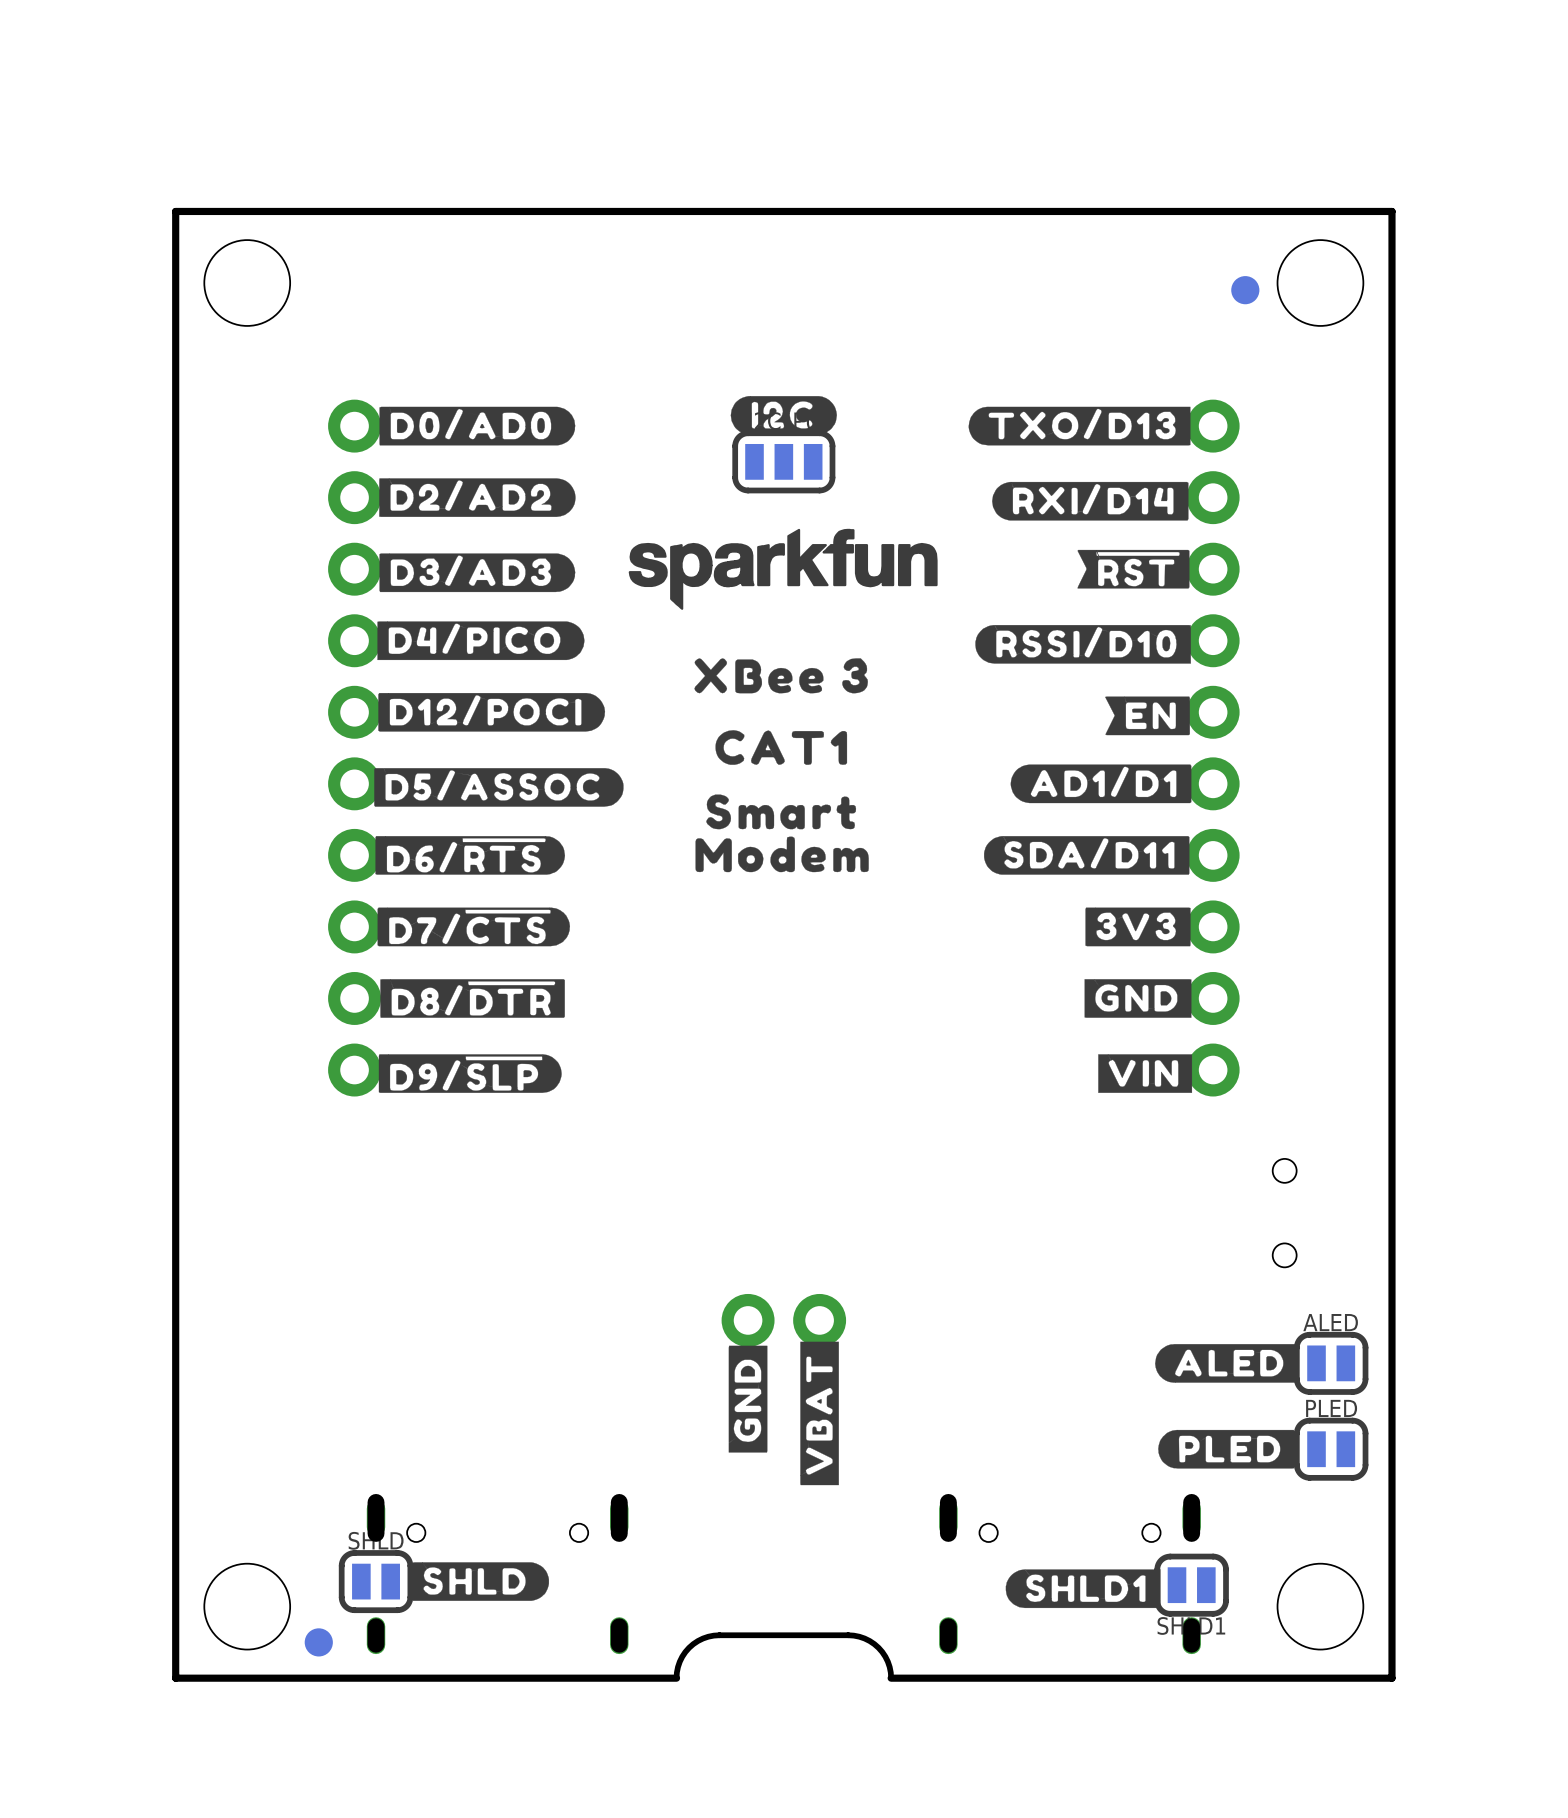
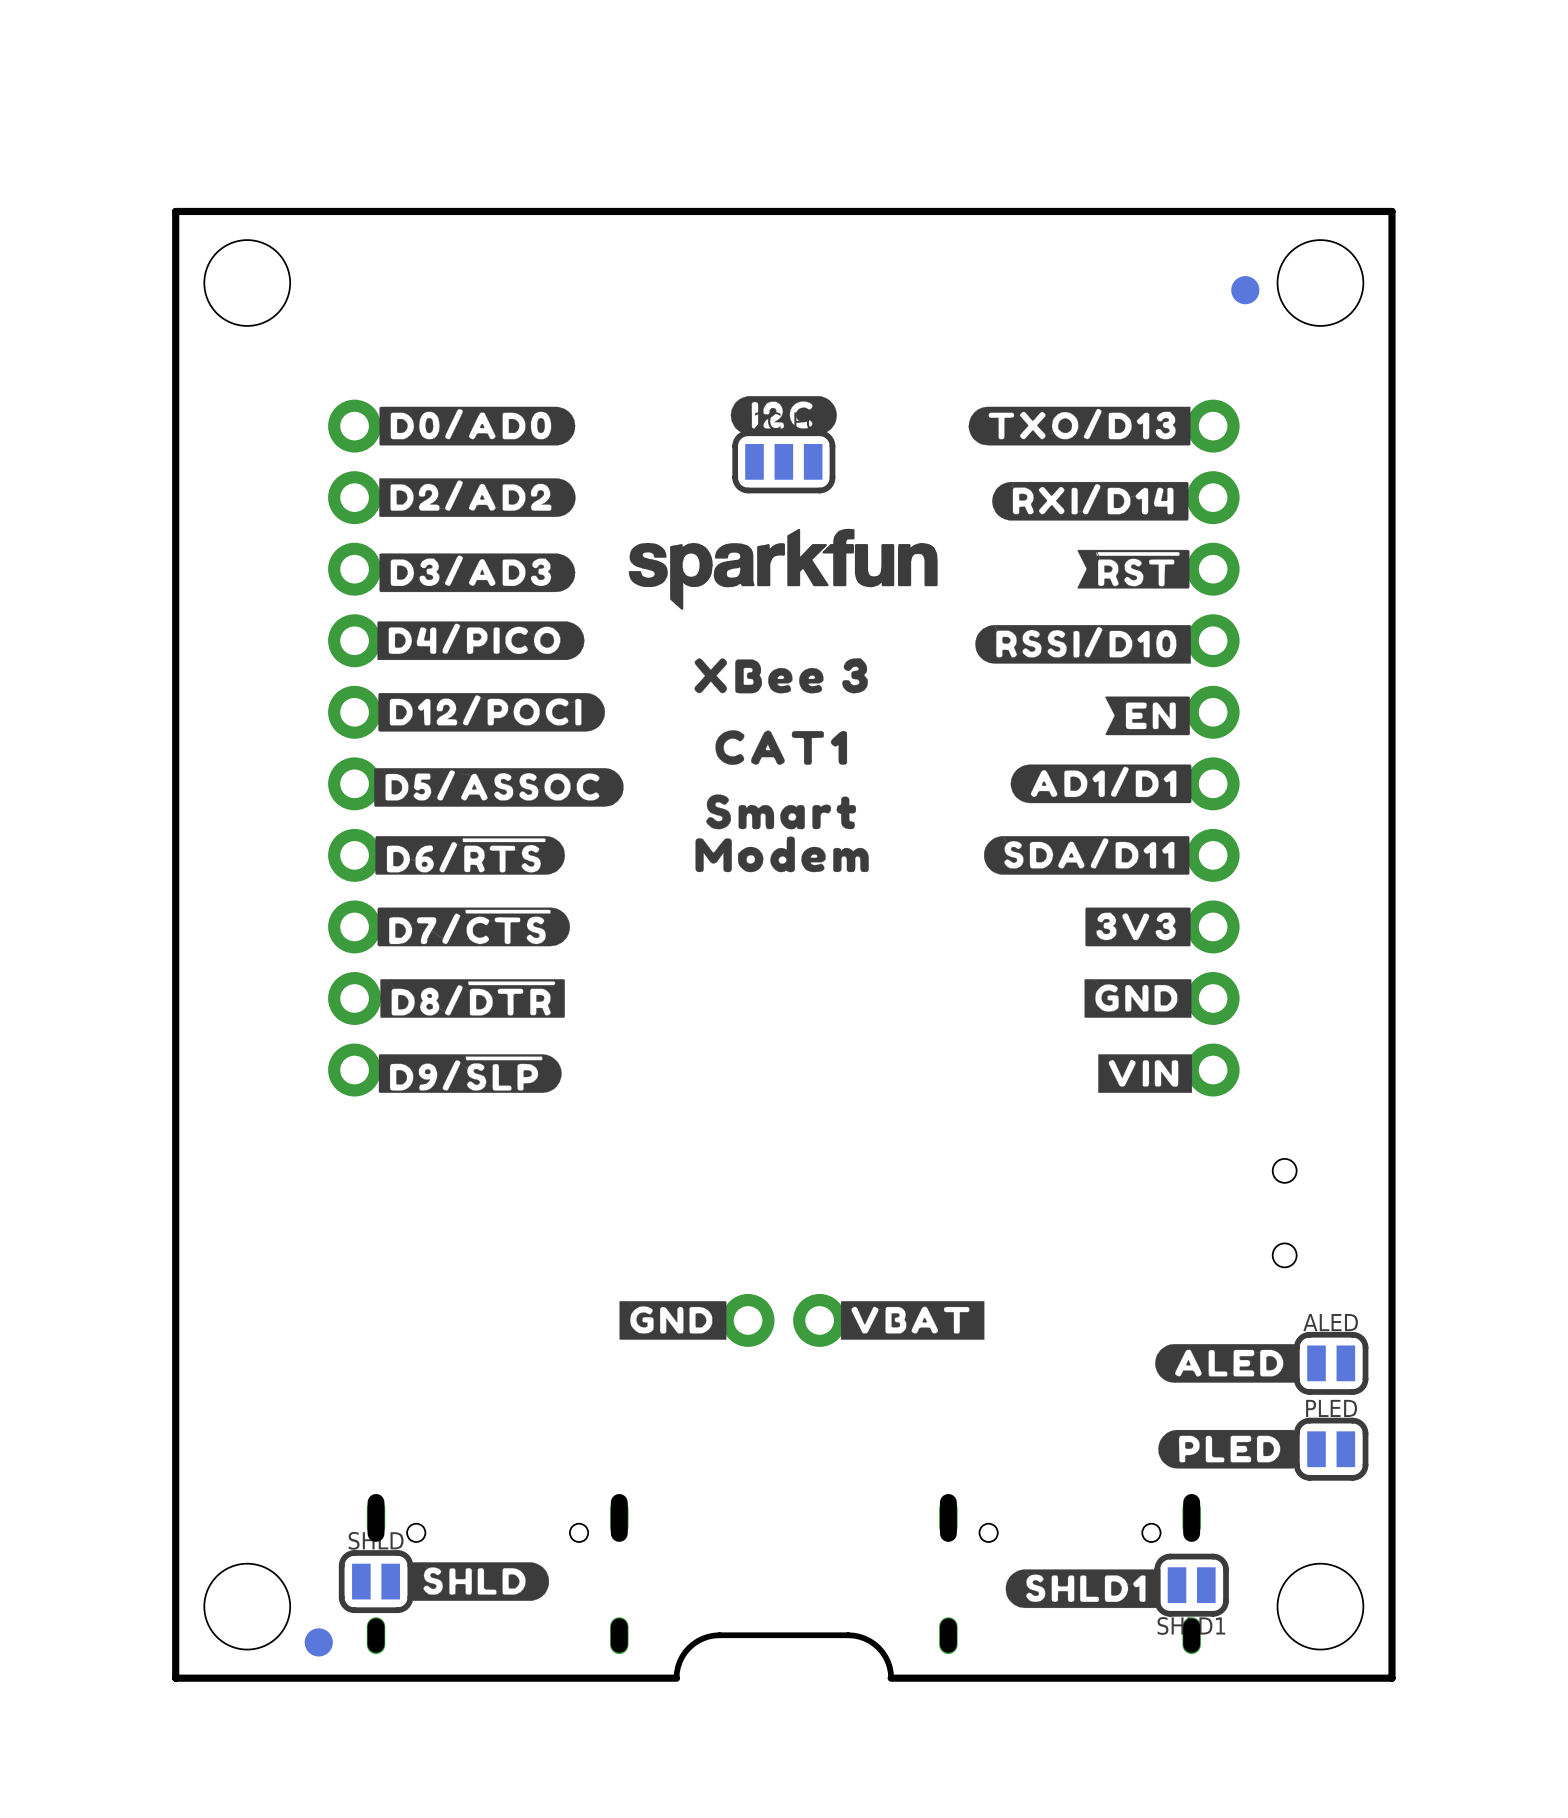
drawing: none -> [619, 1301, 727, 1340]
drawing: none -> [840, 1301, 985, 1340]
drawing: [728, 1341, 839, 1486] -> none

